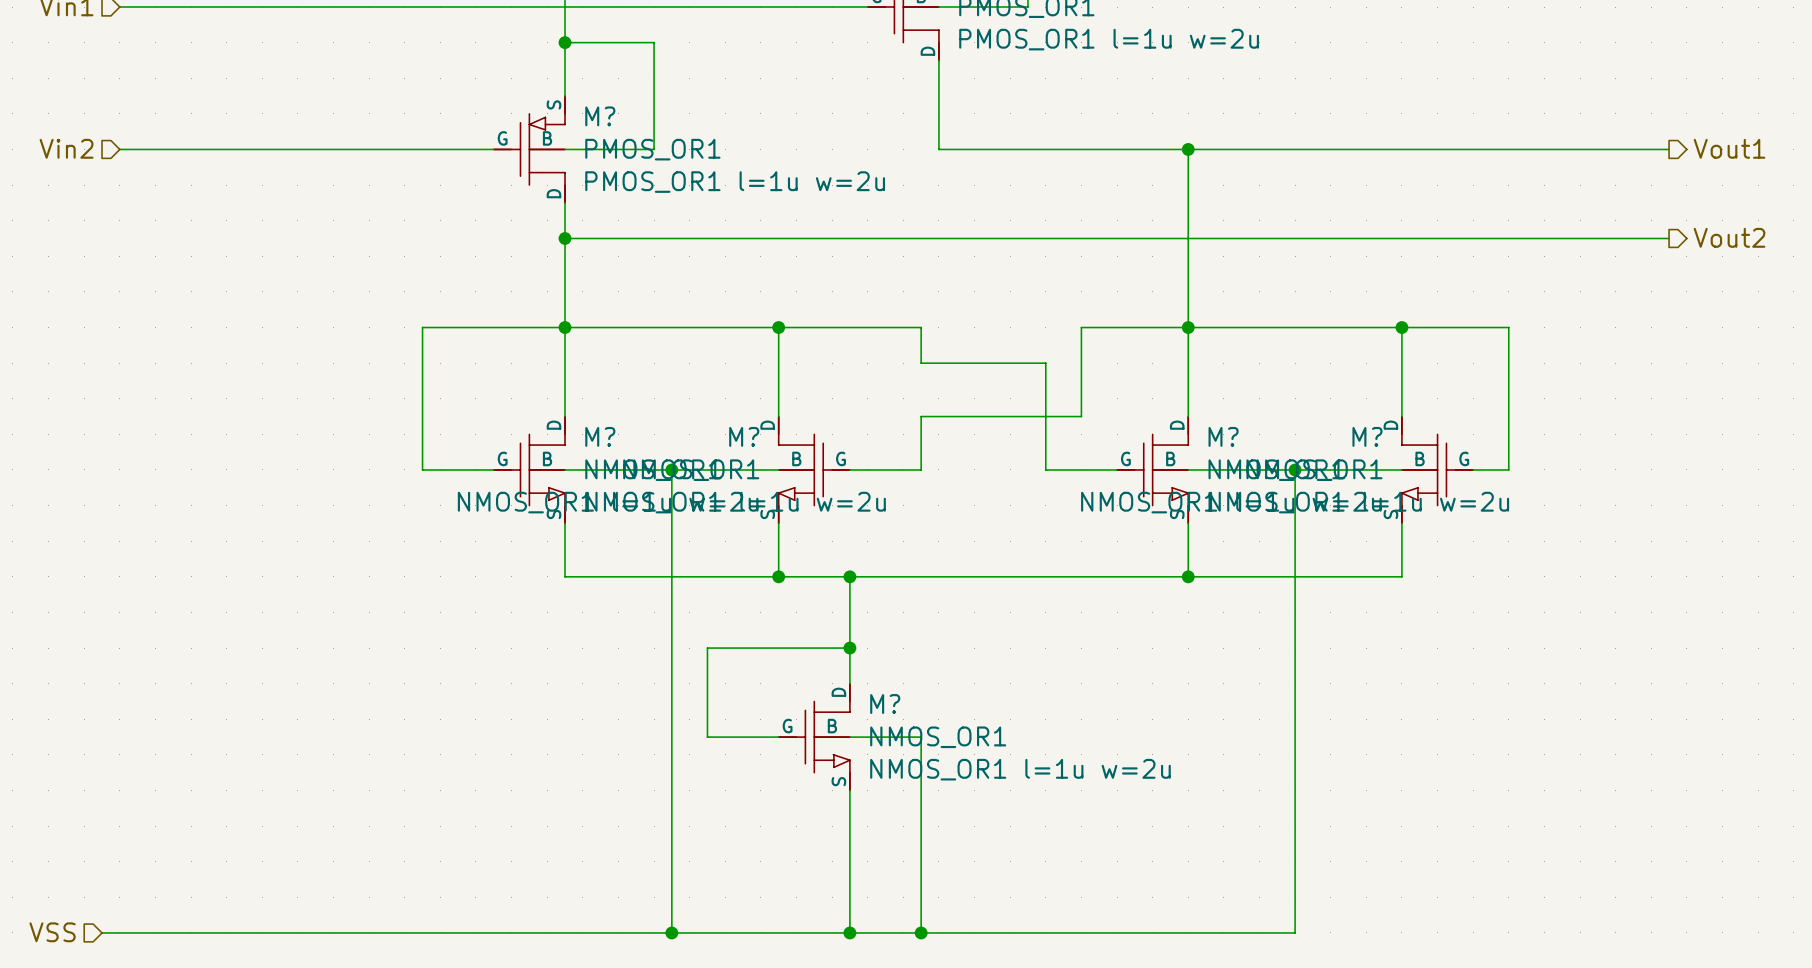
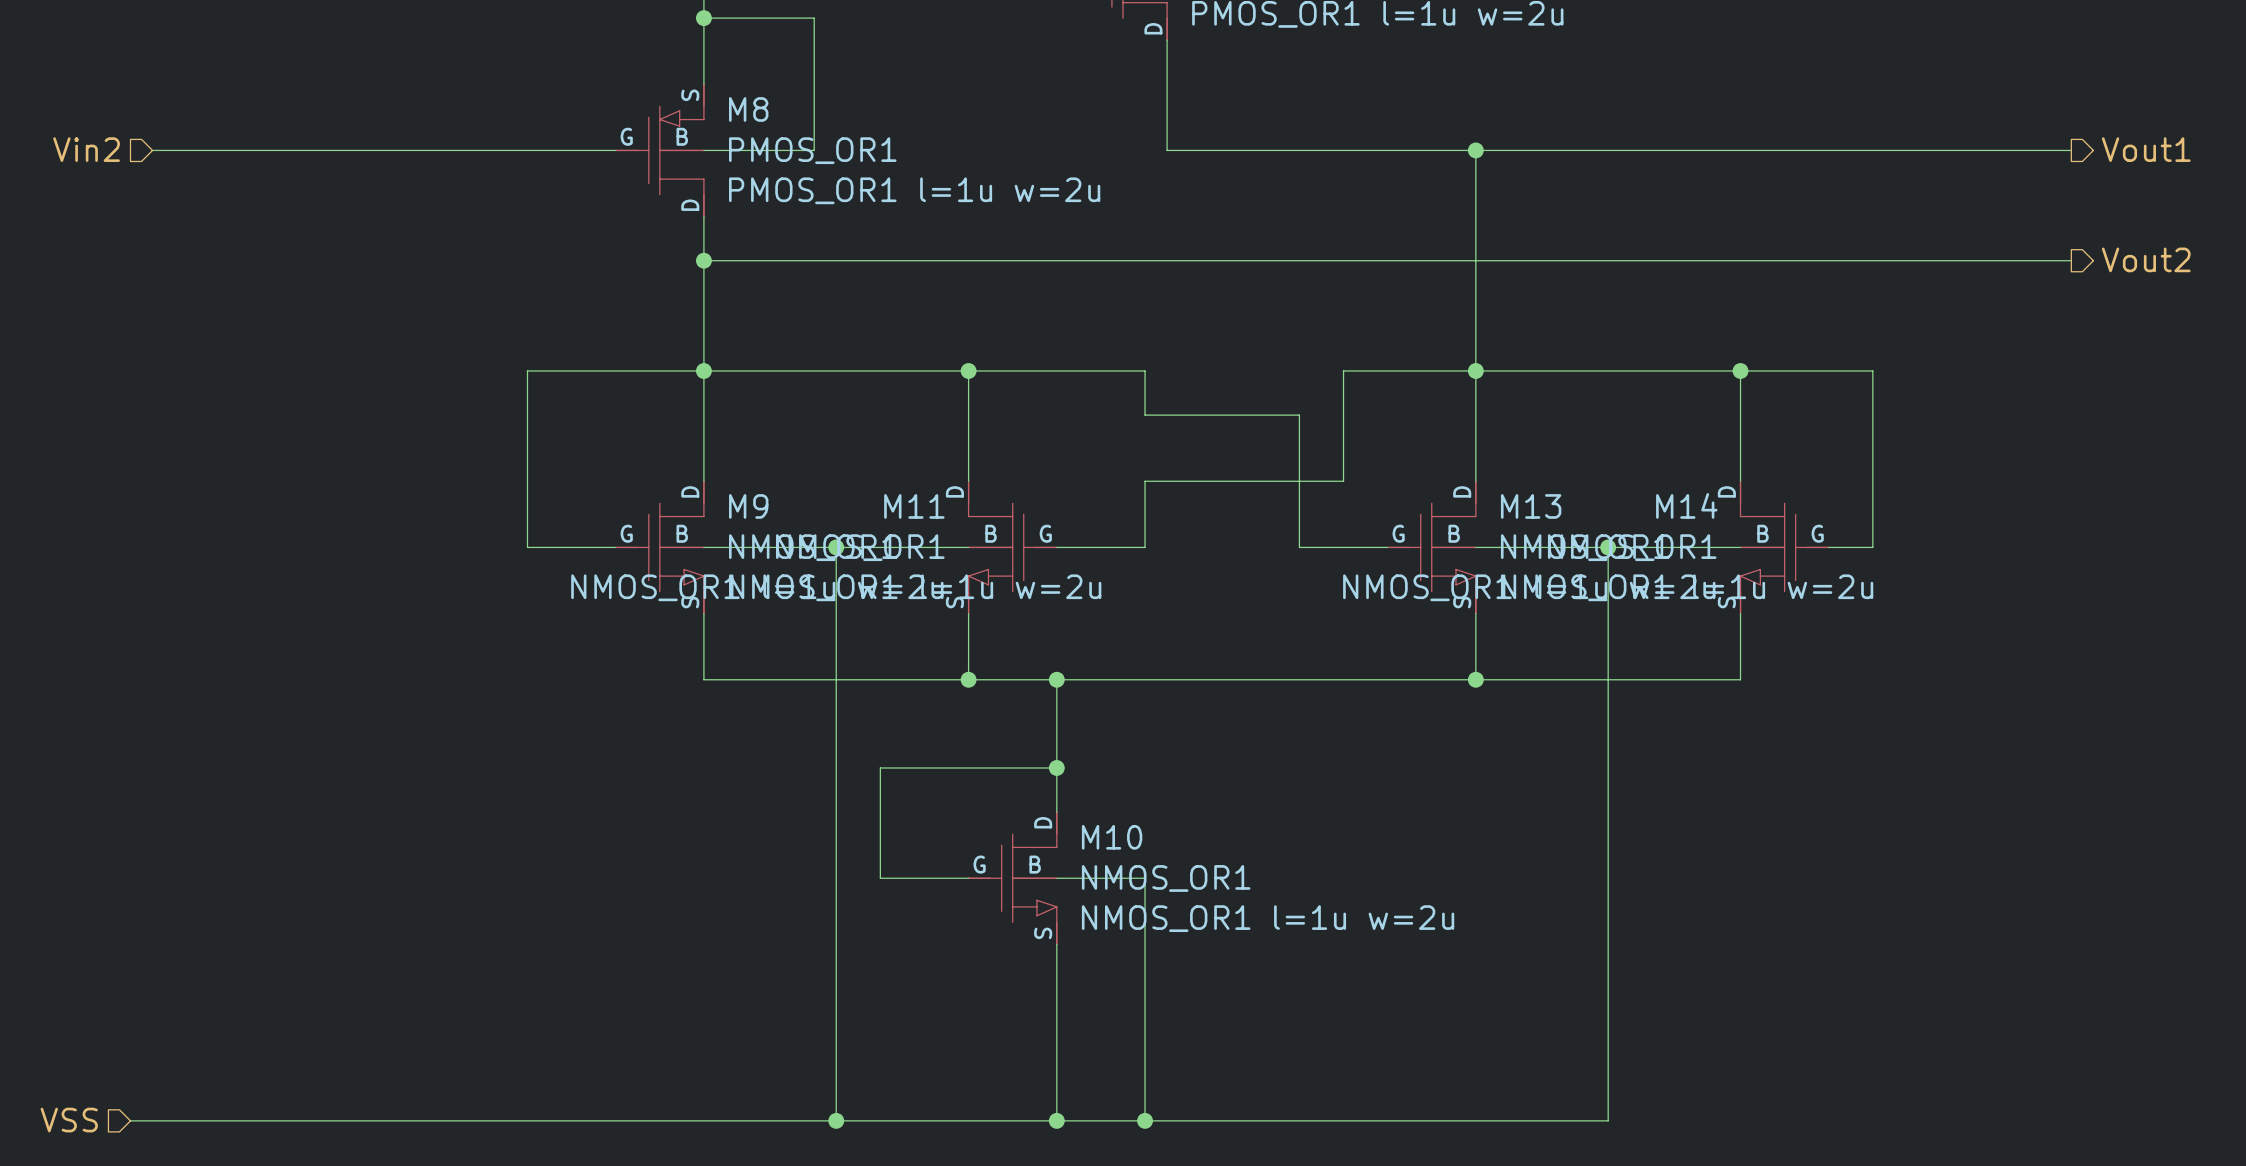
M? name: M? (600, 116) -> M8 (748, 109)
M? name: M? (600, 436) -> M9 (748, 506)
M? name: M? (744, 436) -> M11 (914, 506)
M? name: M? (1223, 436) -> M13 (1531, 506)
M? name: M? (1367, 436) -> M14 (1686, 505)
M? name: M? (885, 704) -> M10 (1112, 837)

